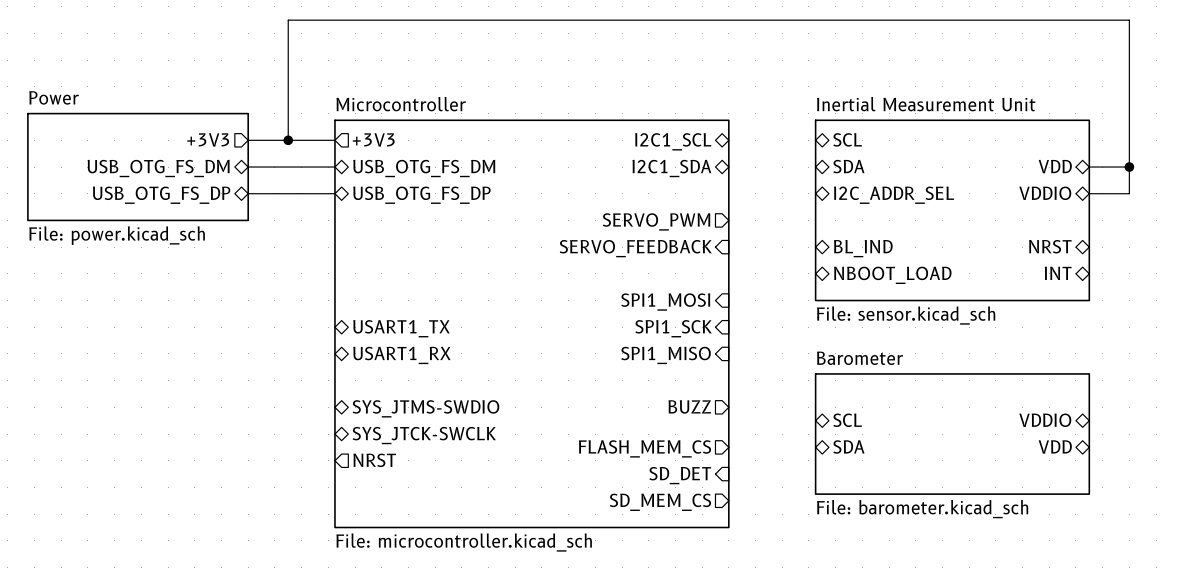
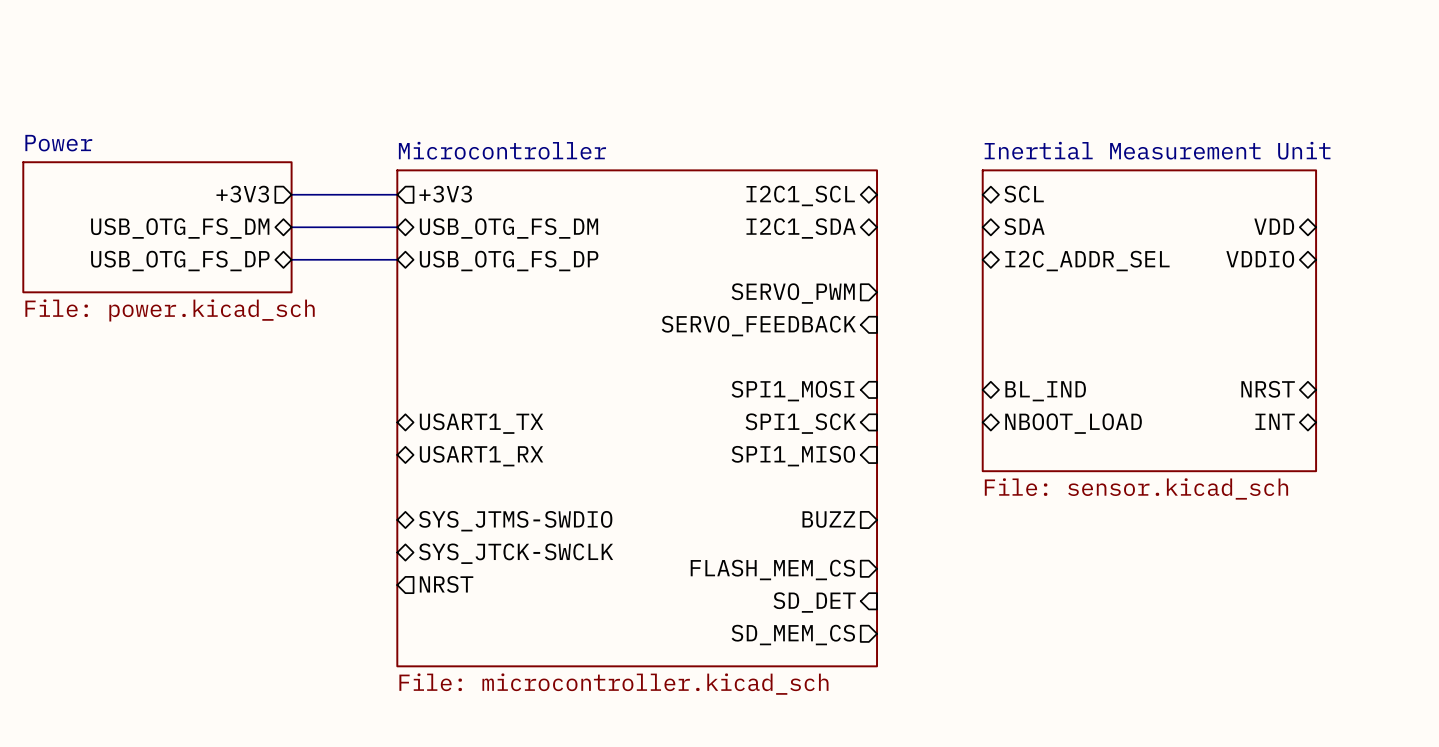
wire: (288, 140) (288, 20) (1129, 20) (1129, 193) (1089, 193) -> none
junction: (288, 140) -> none
wire: (1089, 167) (1129, 167) -> none
junction: (1129, 167) -> none
sheet Inertial Measurement Unit: File: sensor.kicad_sch (952, 210) -> none
sheet Inertial Measurement Unit: none -> File: sensor.kicad_sch (1149, 320)
sheet pin position: NRST (1050, 246) -> NRST (1268, 389)
sheet pin position: BL_IND (863, 248) -> BL_IND (1045, 391)
sheet pin position: INT (1058, 273) -> INT (1275, 421)
sheet pin position: NBOOT_LOAD (892, 275) -> NBOOT_LOAD (1073, 423)
sheet pin: SCL (847, 420) -> none
sheet pin: VDDIO (1045, 420) -> none
sheet Barometer: File: barometer.kicad_sch (952, 434) -> none
sheet pin: SDA (848, 446) -> none
sheet pin: VDD (1055, 446) -> none

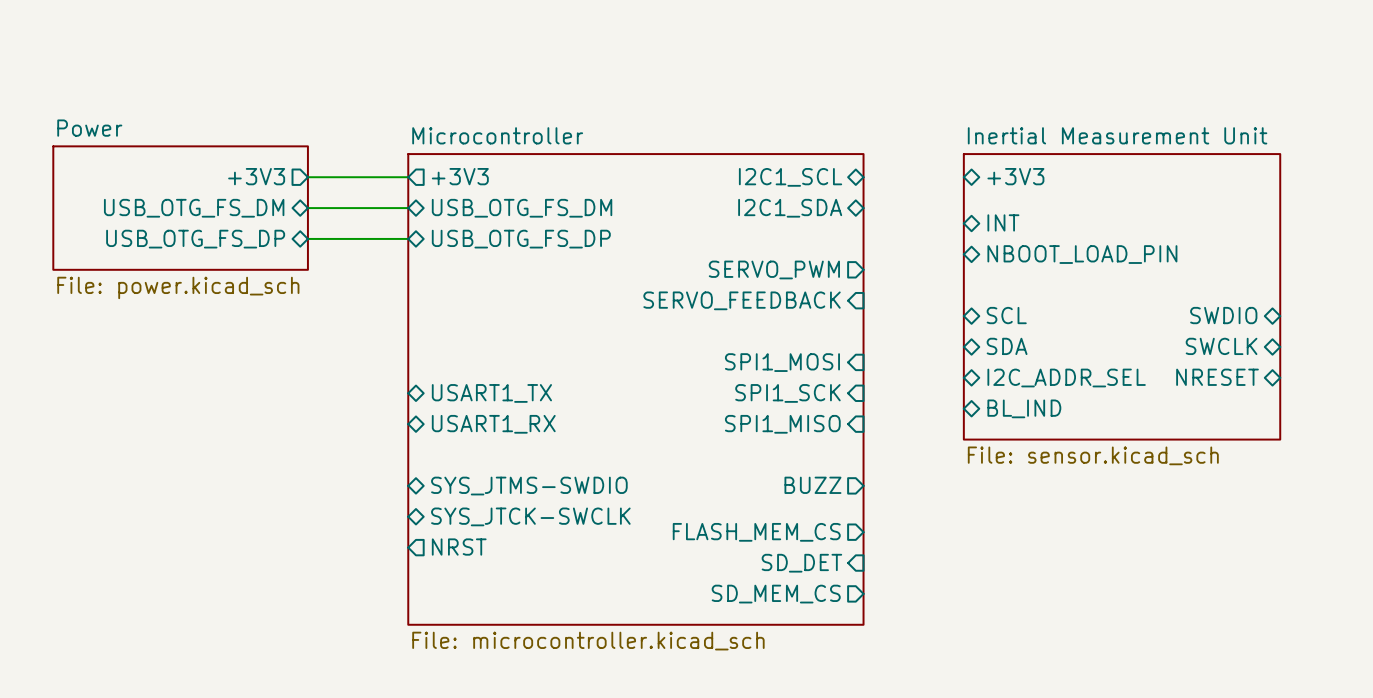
sheet pin: SCL (1024, 194) -> +3V3 (1015, 176)
sheet pin position: SDA (1024, 226) -> SDA (1007, 346)
sheet pin: VDD (1274, 226) -> none
sheet pin: none -> INT (1003, 222)
sheet pin: VDDIO (1260, 259) -> none
sheet pin position: I2C_ADDR_SEL (1087, 261) -> I2C_ADDR_SEL (1066, 378)
sheet pin: none -> NBOOT_LOAD_PIN (1082, 254)
sheet pin: none -> SCL (1006, 315)
sheet pin: none -> SWDIO (1223, 315)
sheet pin: none -> SWCLK (1221, 346)
sheet pin: NRST (1268, 389) -> NRESET (1217, 377)
sheet pin position: BL_IND (1045, 391) -> BL_IND (1024, 408)
sheet pin: INT (1275, 421) -> none
sheet pin: NBOOT_LOAD (1073, 423) -> none

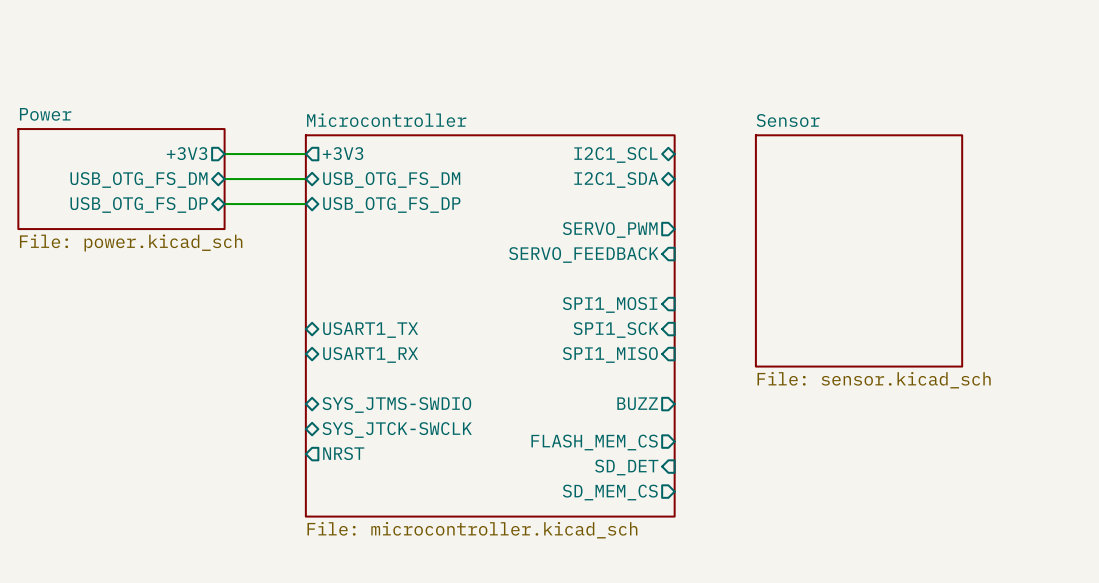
sheet pin: +3V3 (1015, 176) -> none
sheet pin: INT (1003, 222) -> none
sheet pin: NBOOT_LOAD_PIN (1082, 254) -> none
sheet Sensor: none -> File: sensor.kicad_sch (859, 250)
sheet Inertial Measurement Unit: File: sensor.kicad_sch (1122, 296) -> none
sheet pin: SCL (1006, 315) -> none
sheet pin: SWDIO (1223, 315) -> none
sheet pin: SDA (1007, 346) -> none
sheet pin: SWCLK (1221, 346) -> none
sheet pin: NRESET (1217, 377) -> none
sheet pin: I2C_ADDR_SEL (1066, 378) -> none
sheet pin: BL_IND (1024, 408) -> none

